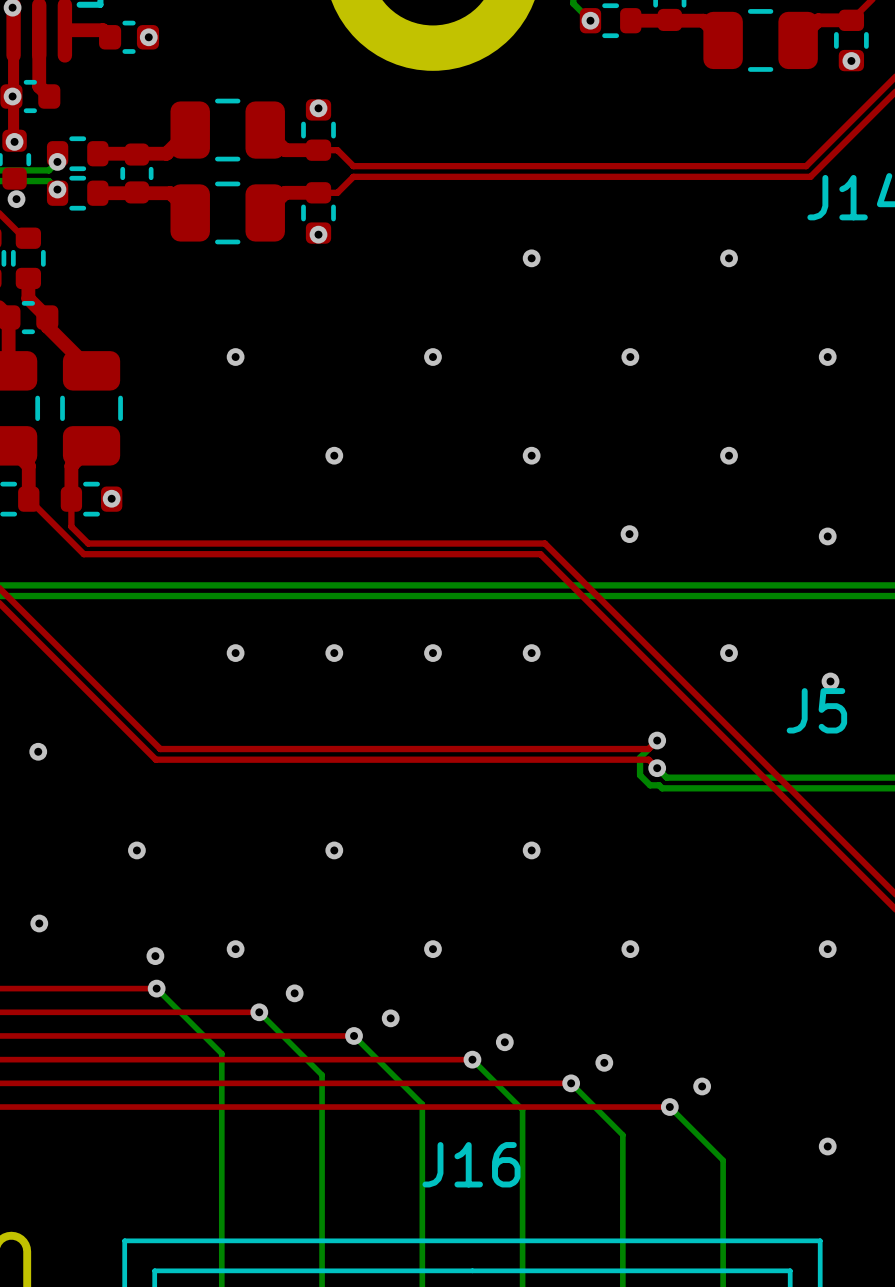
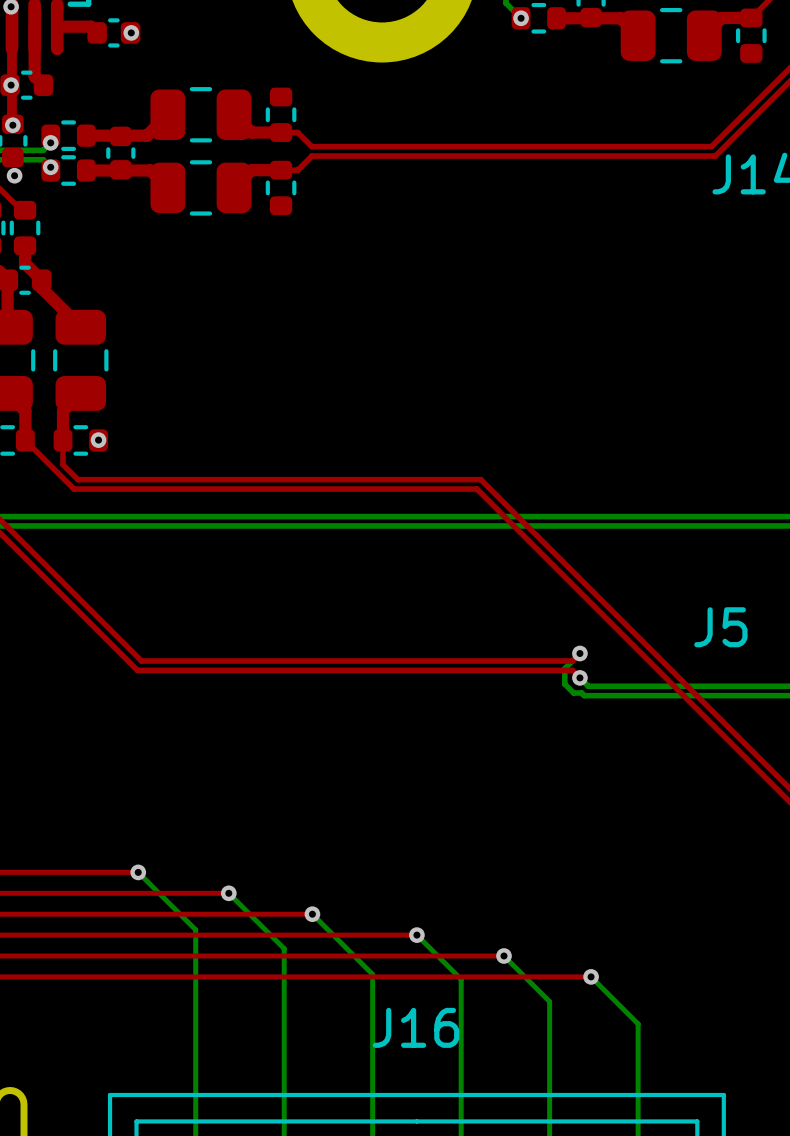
via: (851, 60) -> none
via: (318, 108) -> none
via: (318, 234) -> none
via: (531, 258) -> none
via: (729, 258) -> none
via: (235, 357) -> none
via: (432, 357) -> none
via: (630, 357) -> none
via: (827, 357) -> none
via: (334, 455) -> none
via: (531, 455) -> none
via: (729, 455) -> none
via: (629, 534) -> none
via: (827, 536) -> none
via: (235, 653) -> none
via: (334, 653) -> none
via: (432, 653) -> none
via: (531, 653) -> none
via: (729, 653) -> none
via: (830, 681) -> none
via: (38, 751) -> none
via: (136, 850) -> none
via: (334, 850) -> none
via: (531, 850) -> none
via: (39, 923) -> none
via: (235, 949) -> none
via: (432, 949) -> none
via: (630, 949) -> none
via: (827, 949) -> none
via: (155, 956) -> none
via: (294, 993) -> none
via: (390, 1018) -> none
via: (504, 1042) -> none
via: (604, 1062) -> none
via: (702, 1086) -> none
via: (827, 1146) -> none

